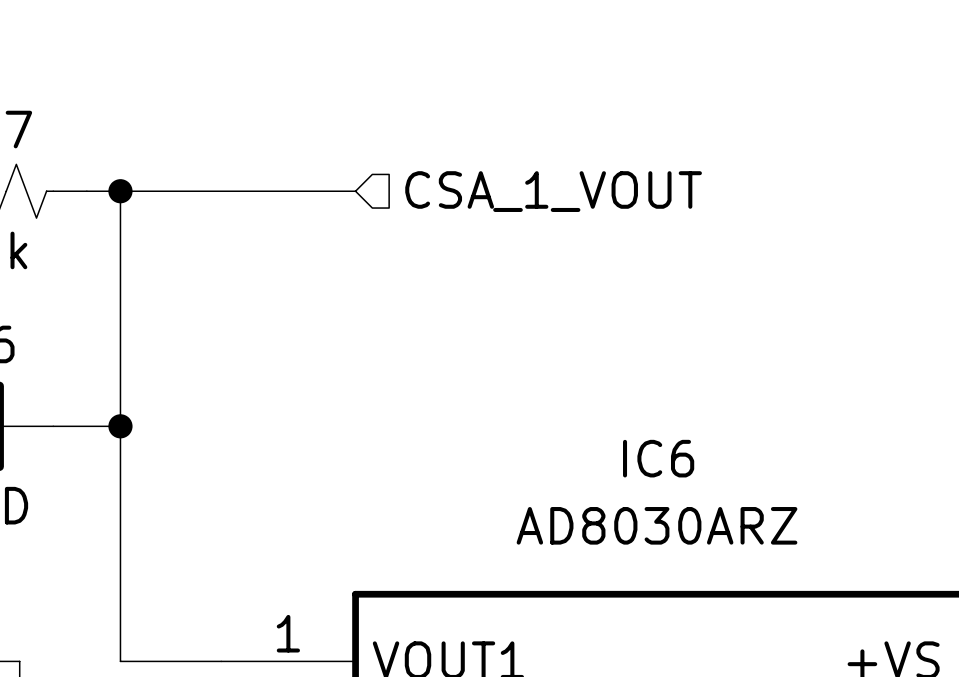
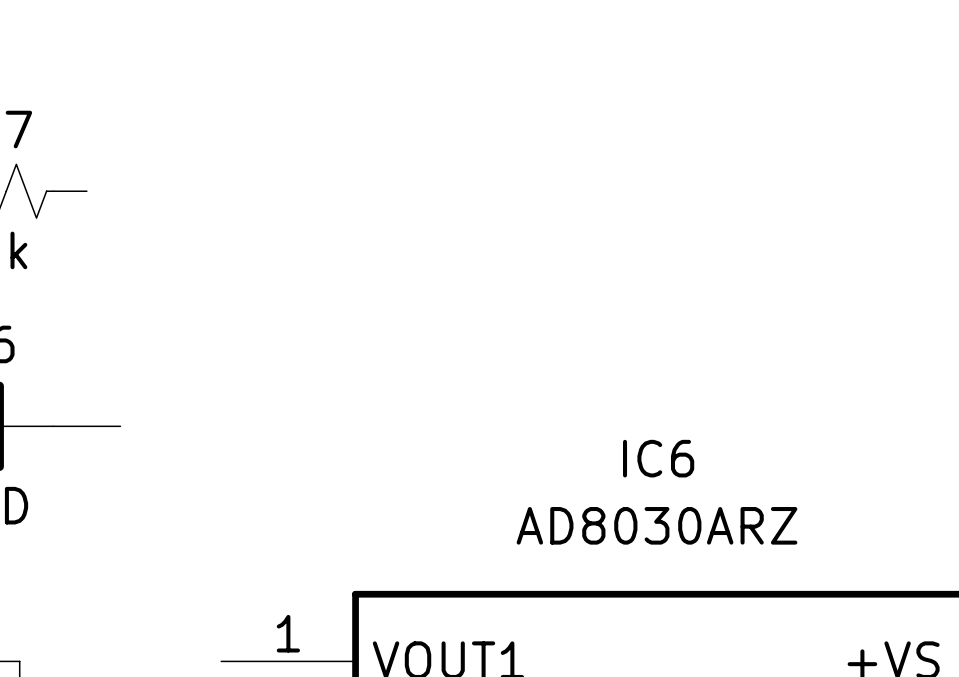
wire: (86, 191) (355, 191) -> none
wire: (120, 191) (120, 661) (221, 661) -> none
junction: (120, 191) -> none
hierarchical label: CSA_1_VOUT (553, 191) -> none
junction: (120, 426) -> none

